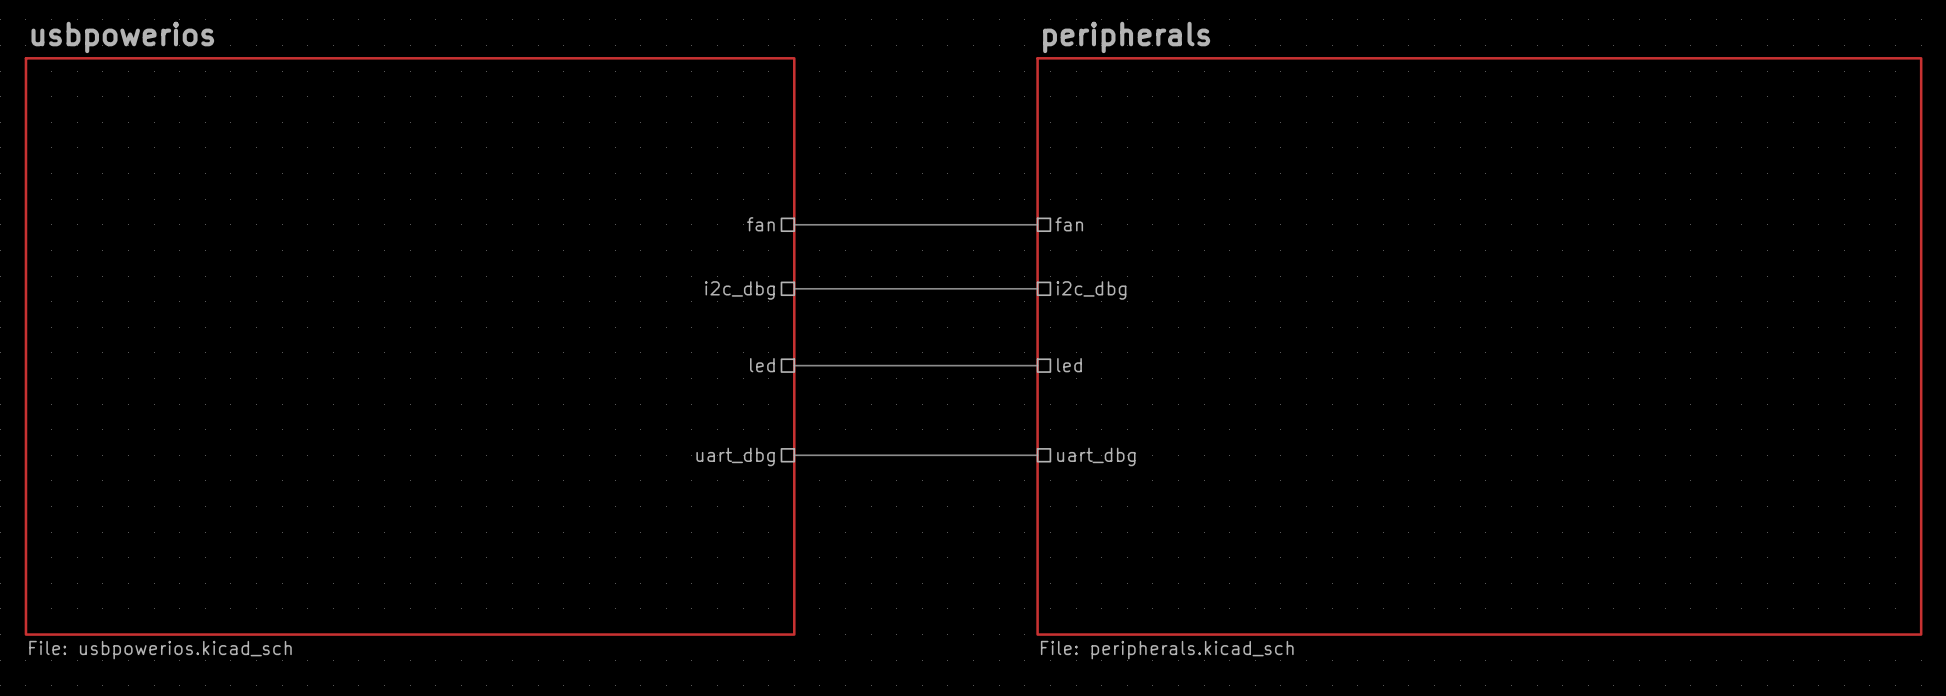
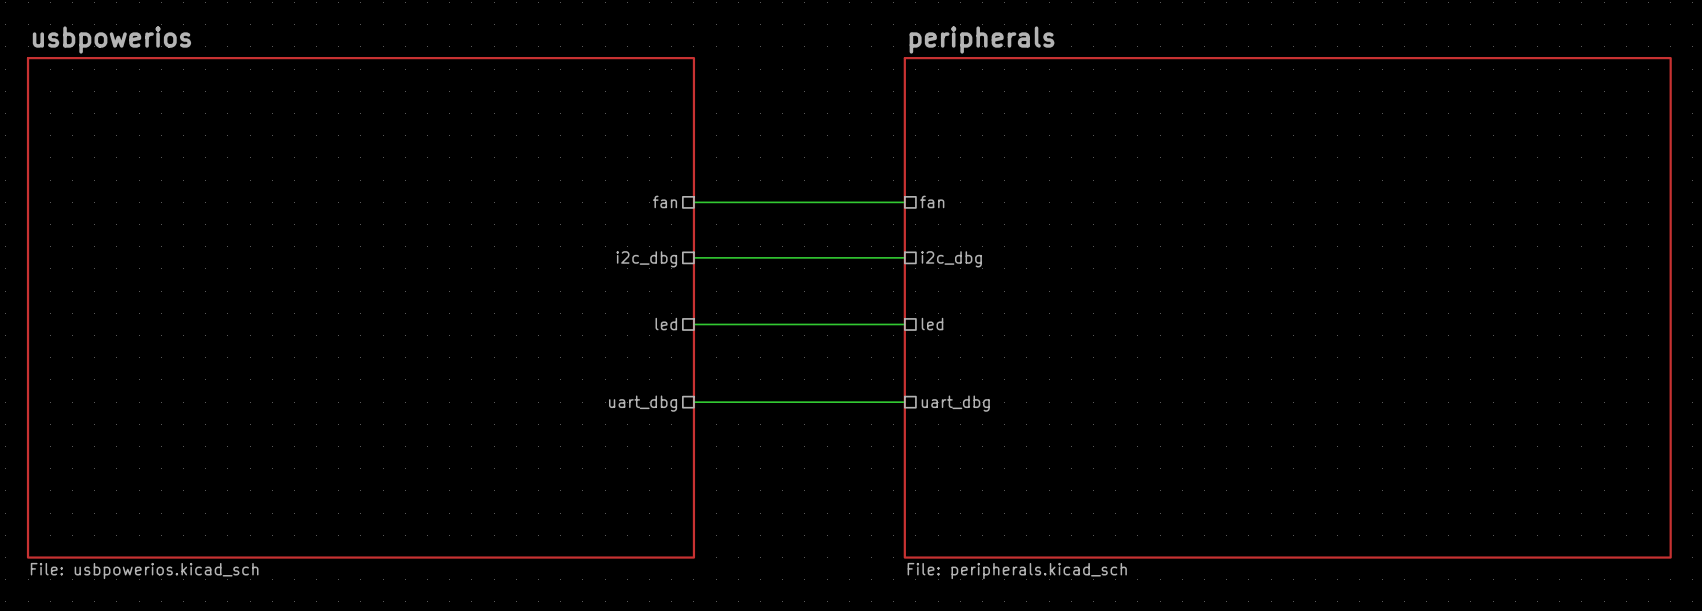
bus: (794, 224) (1037, 224) -> none
bus: (794, 288) (1037, 288) -> none
bus: (794, 365) (1037, 365) -> none
bus: (794, 455) (1037, 455) -> none

